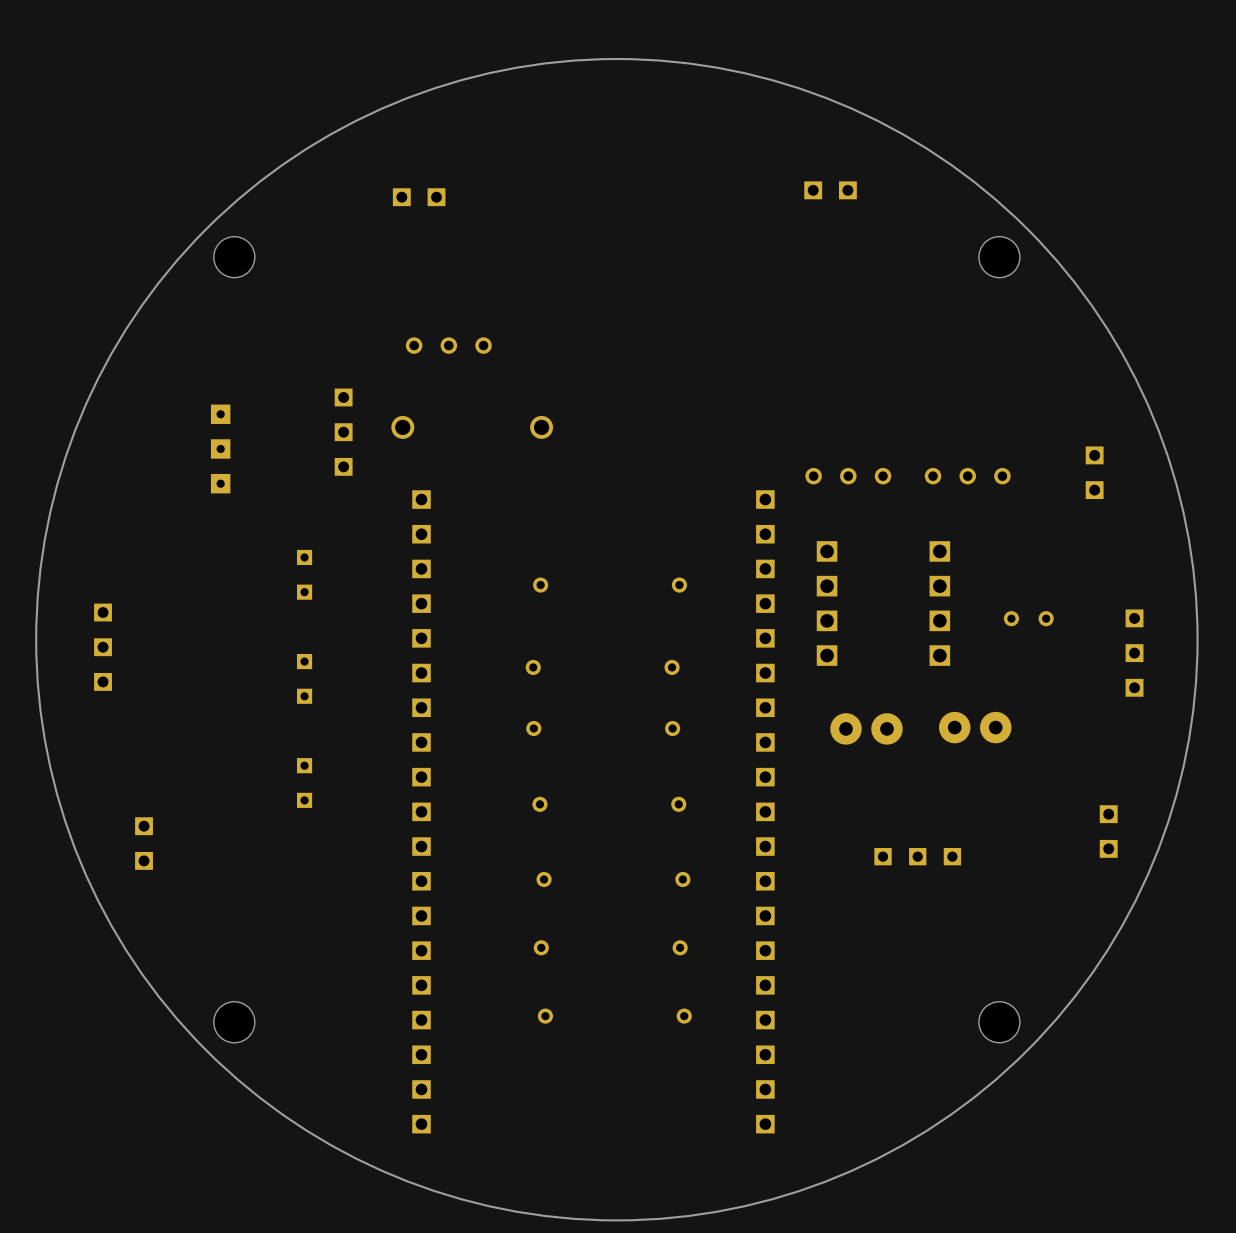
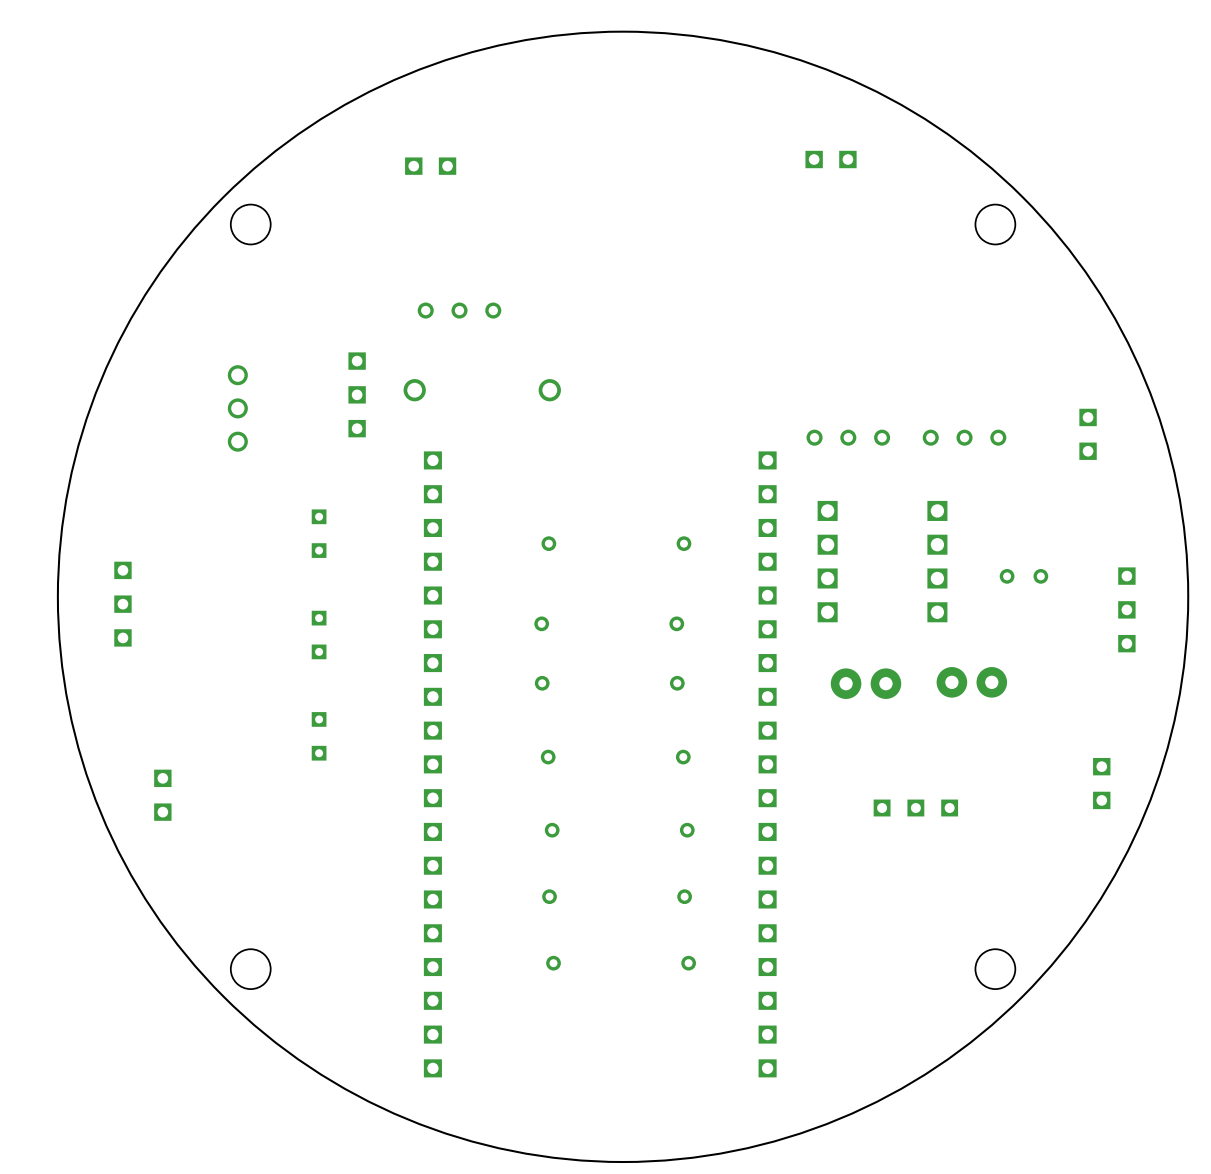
part footprint: [210, 404, 231, 494] -> [227, 365, 248, 452]

